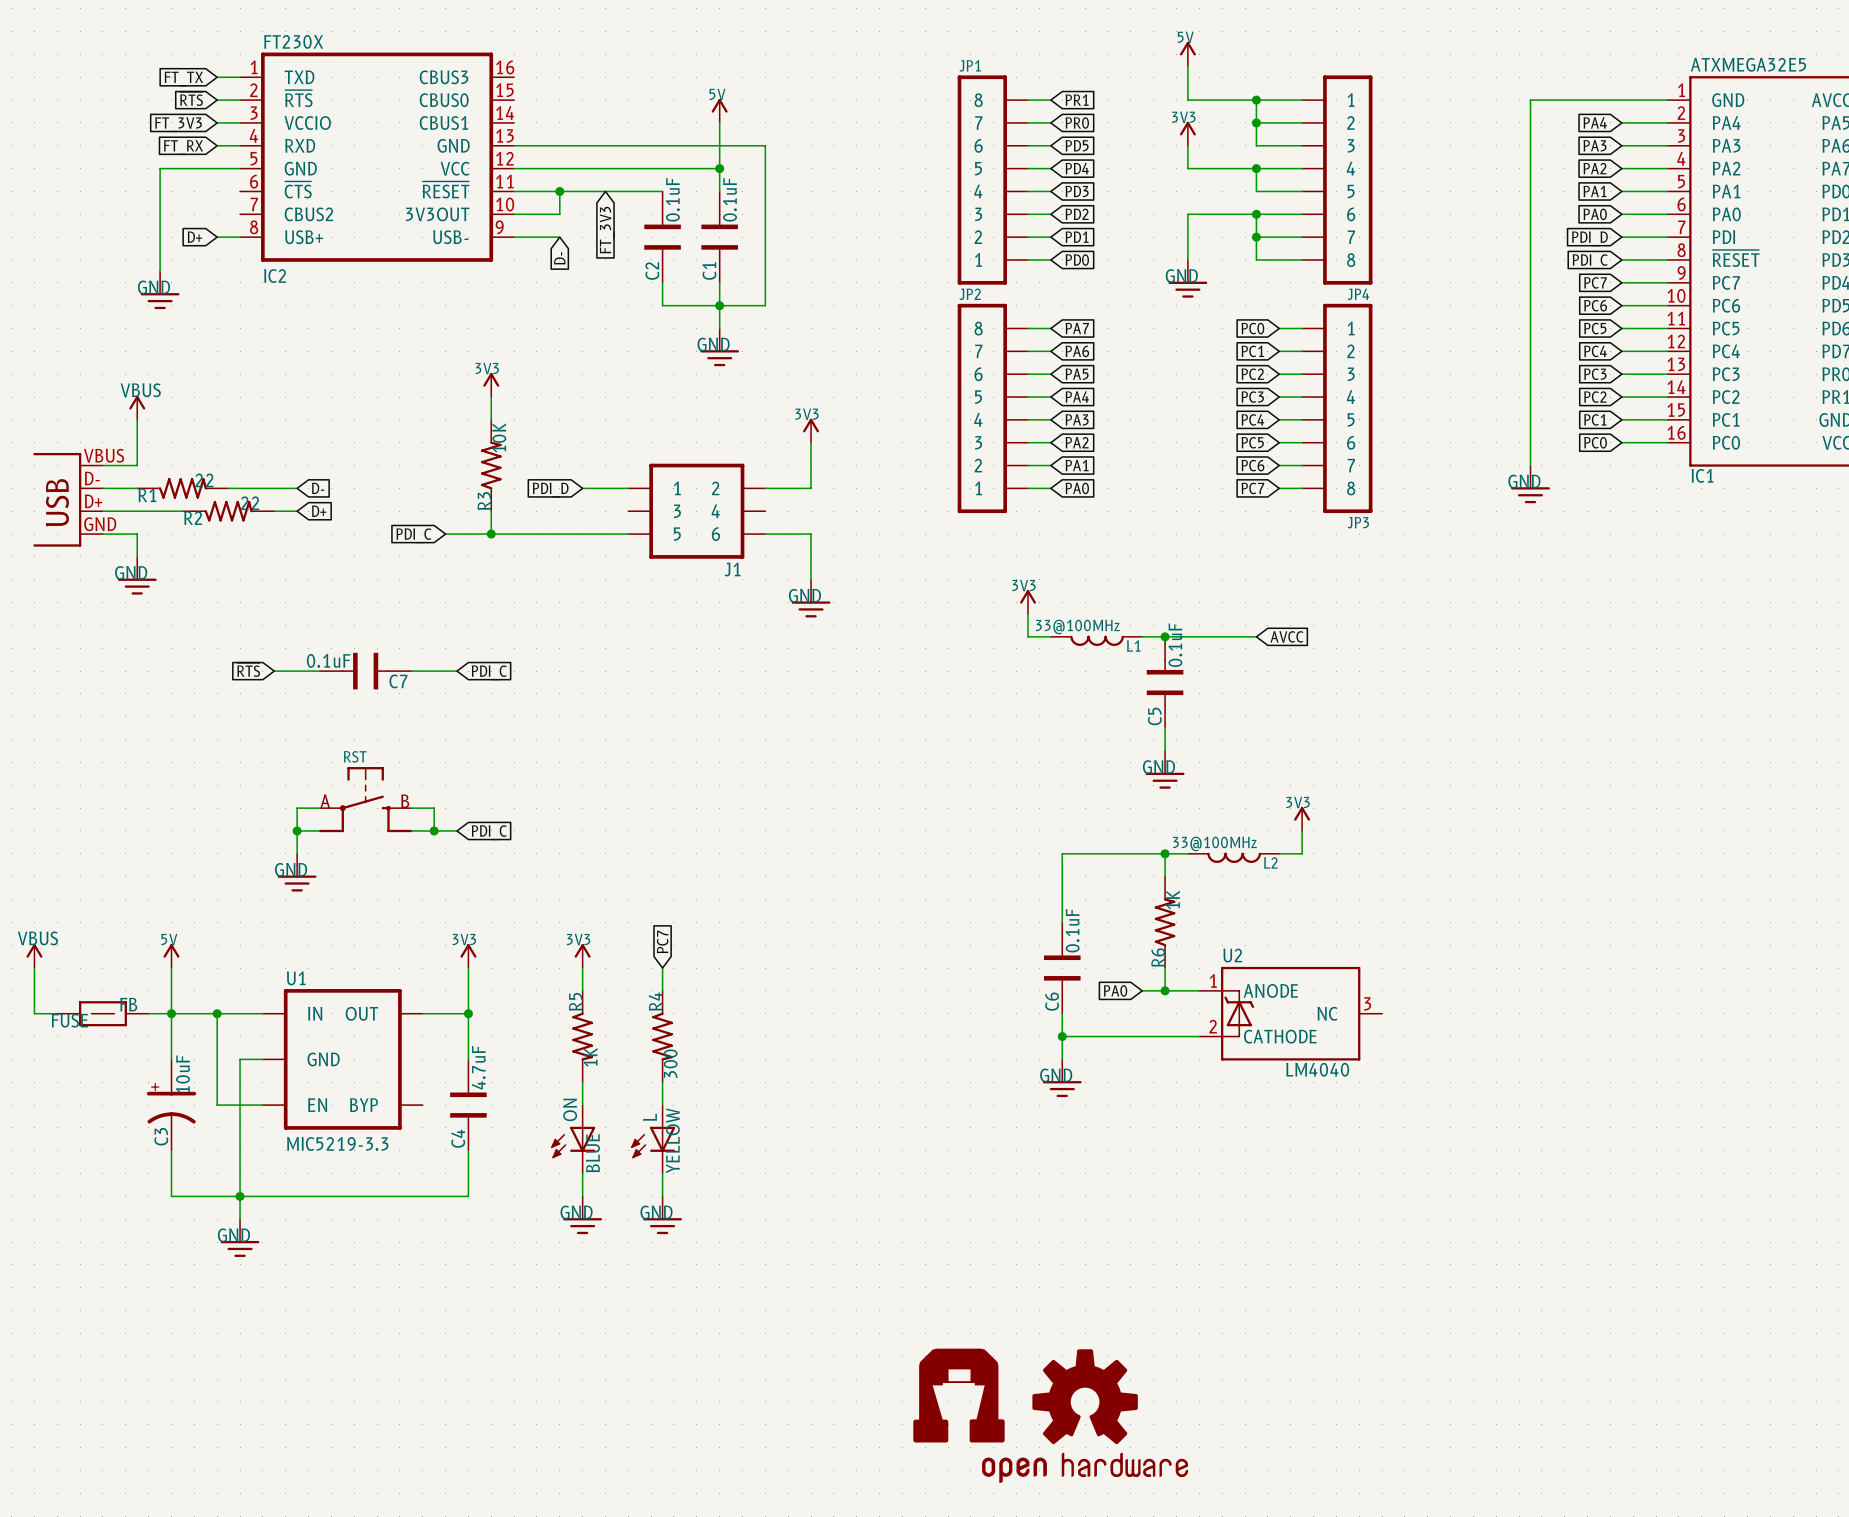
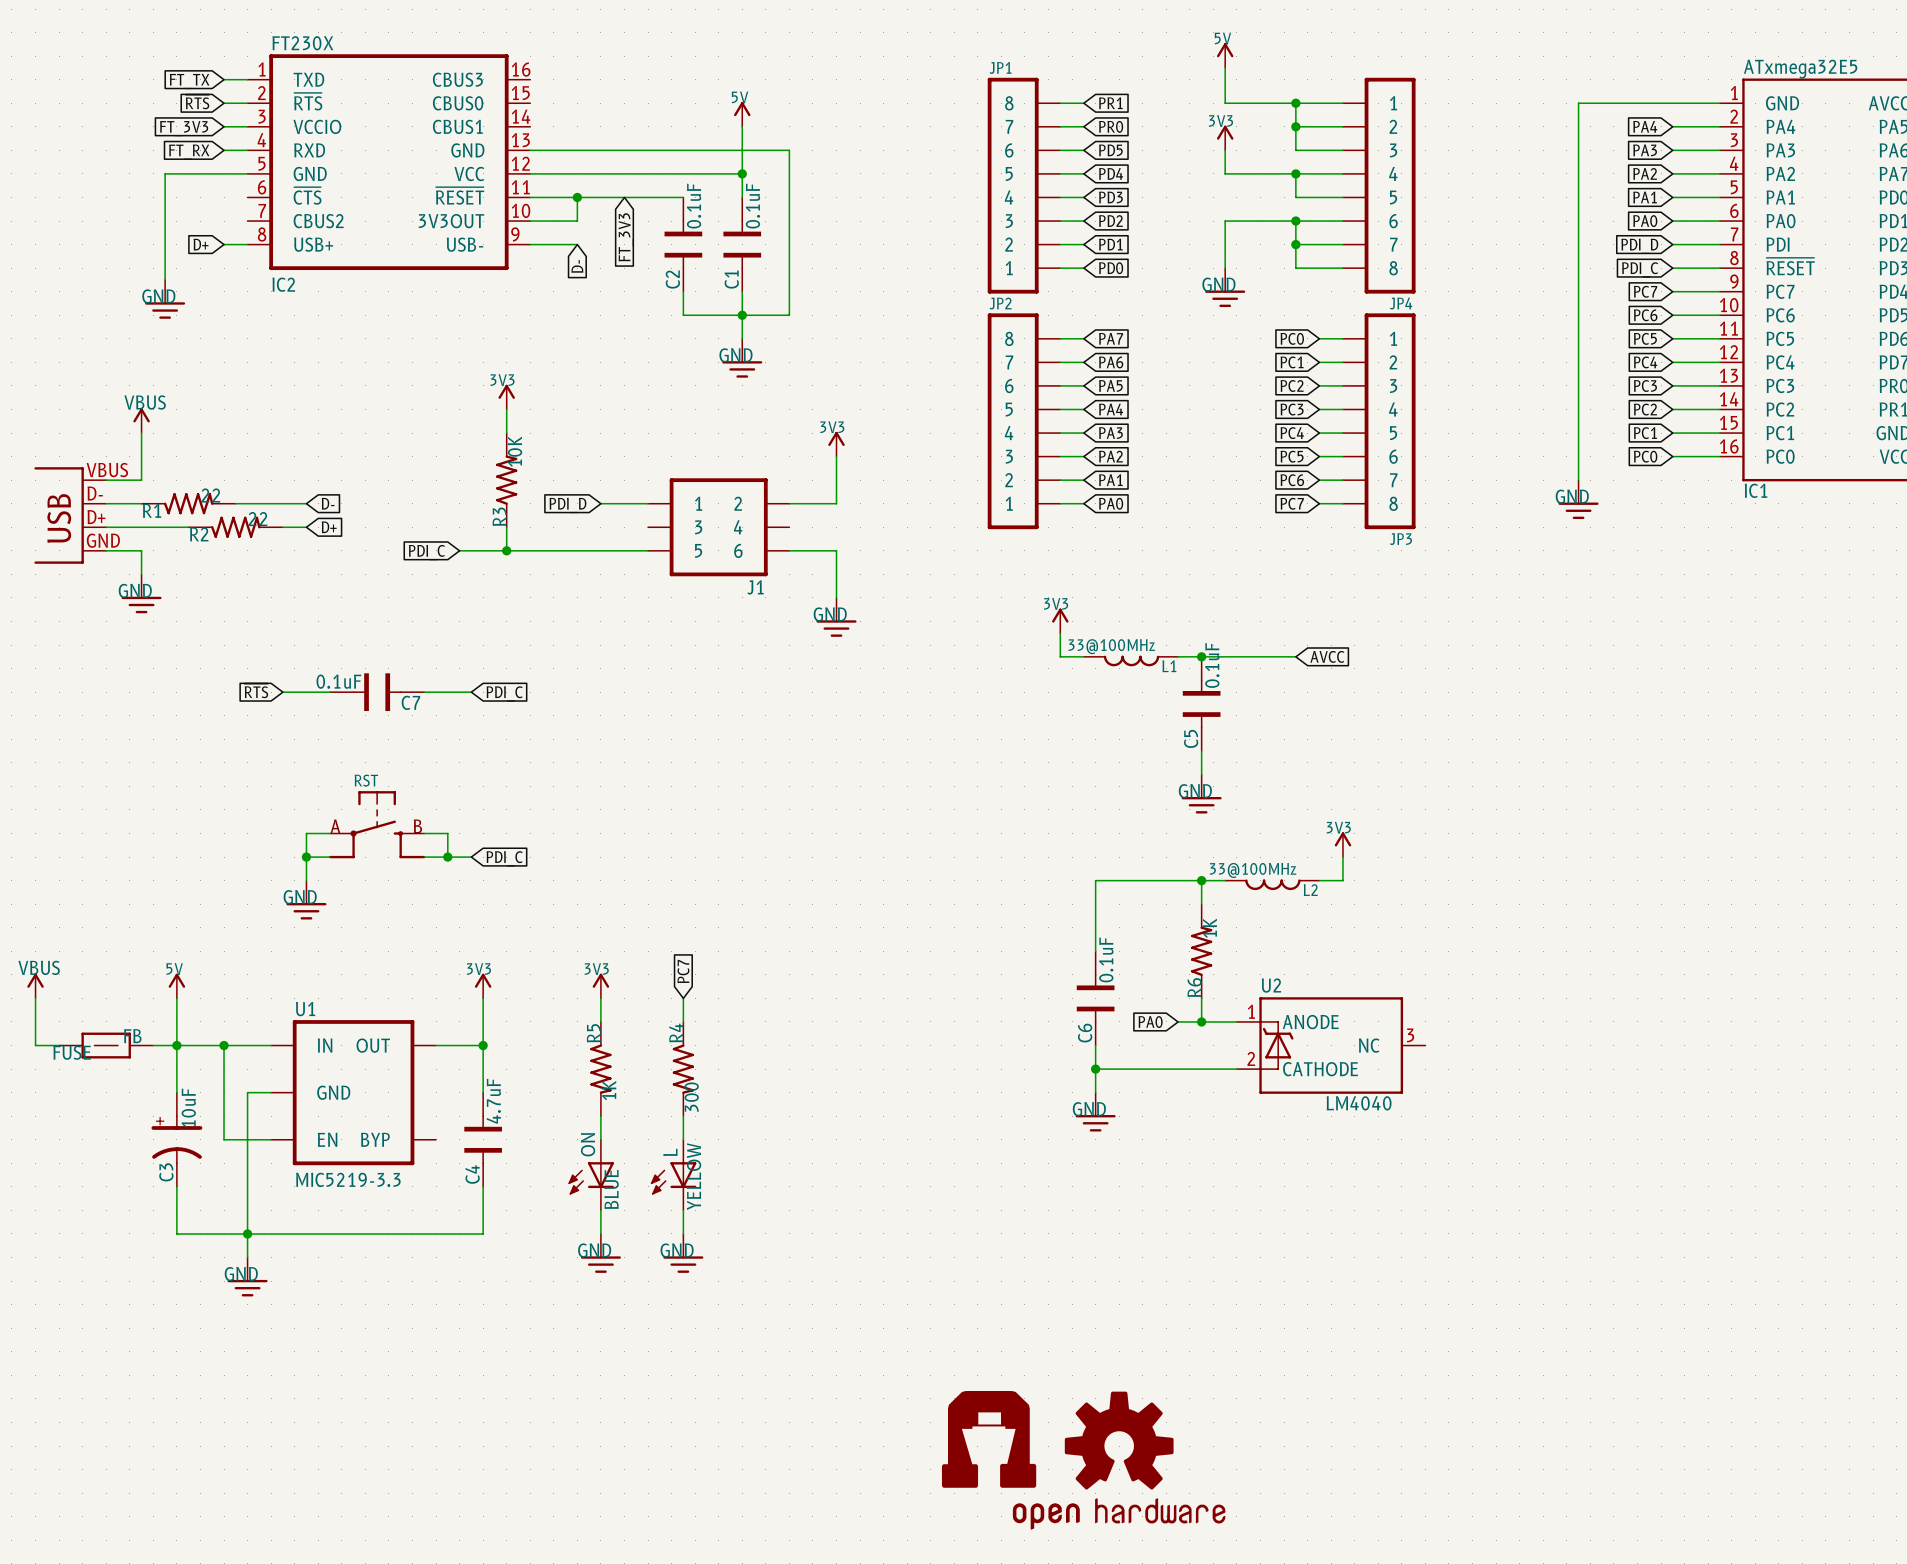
IC1 text: ATXMEGA32E5 (1748, 64) -> ATxmega32E5 (1800, 69)

